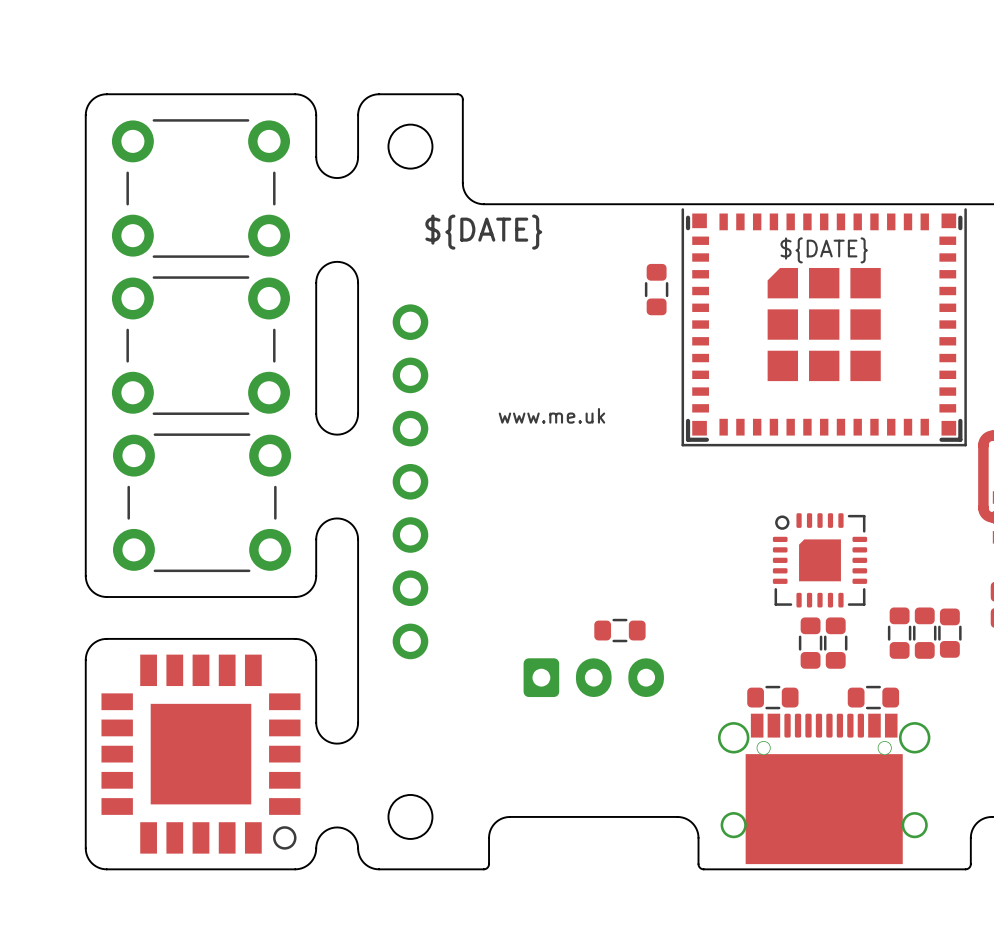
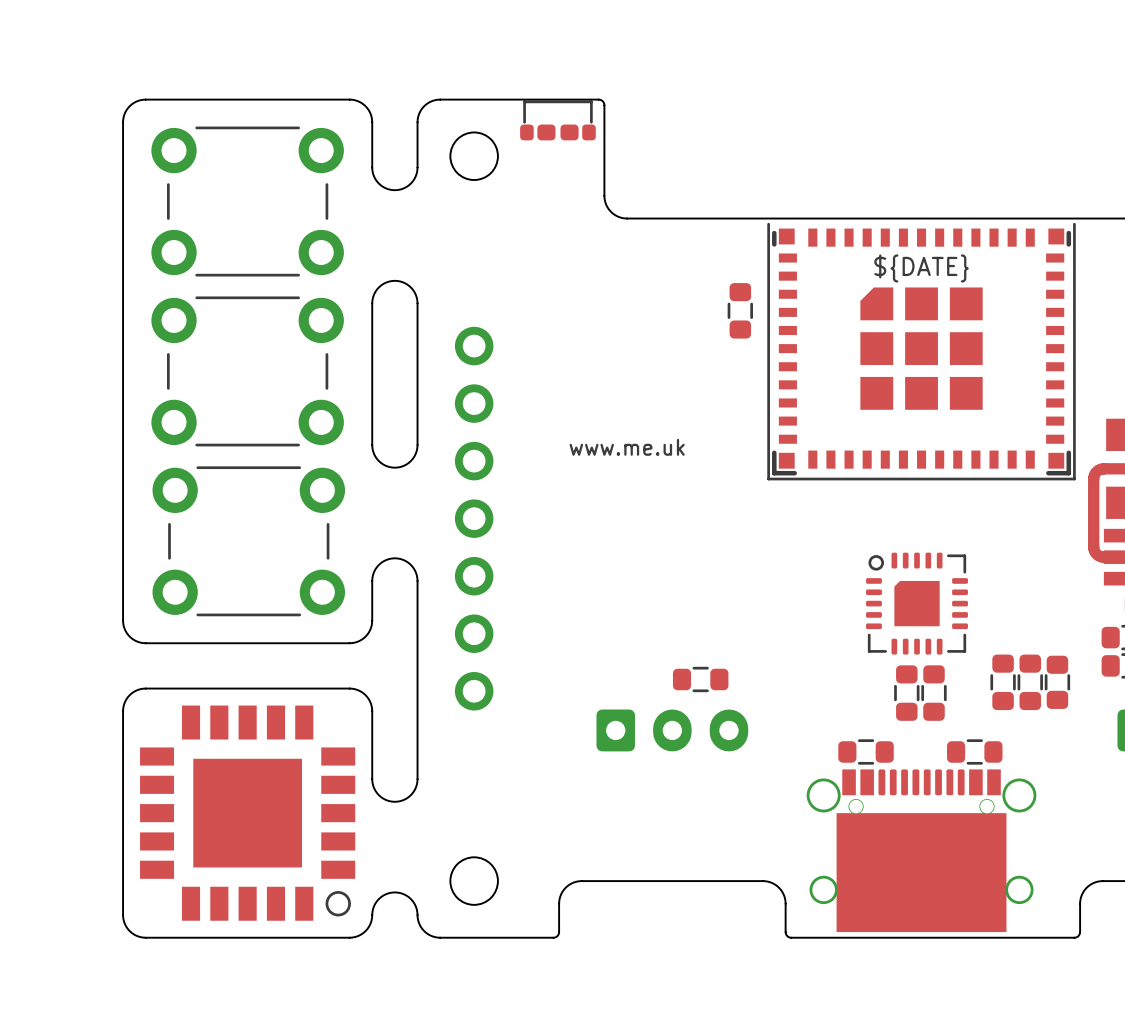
board edge: (457, 94) (462, 98) (462, 183) (467, 196) (474, 202) (481, 204) (551, 204) -> (525, 99) (598, 99) (603, 101) (604, 200) (612, 213) (627, 218)
part: none -> (557, 120)
text: ${DATE} (483, 232) -> none

